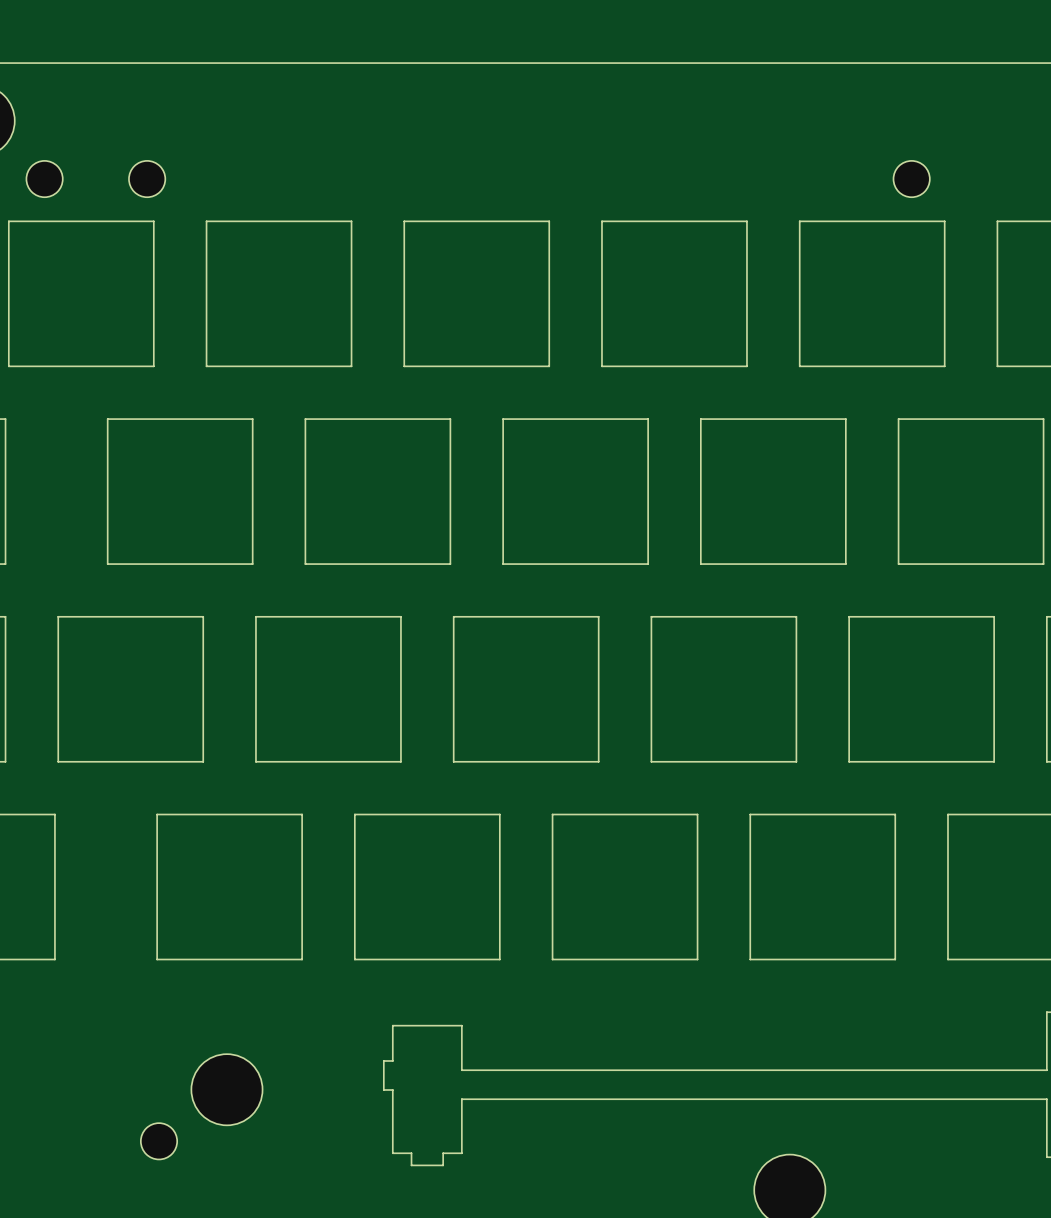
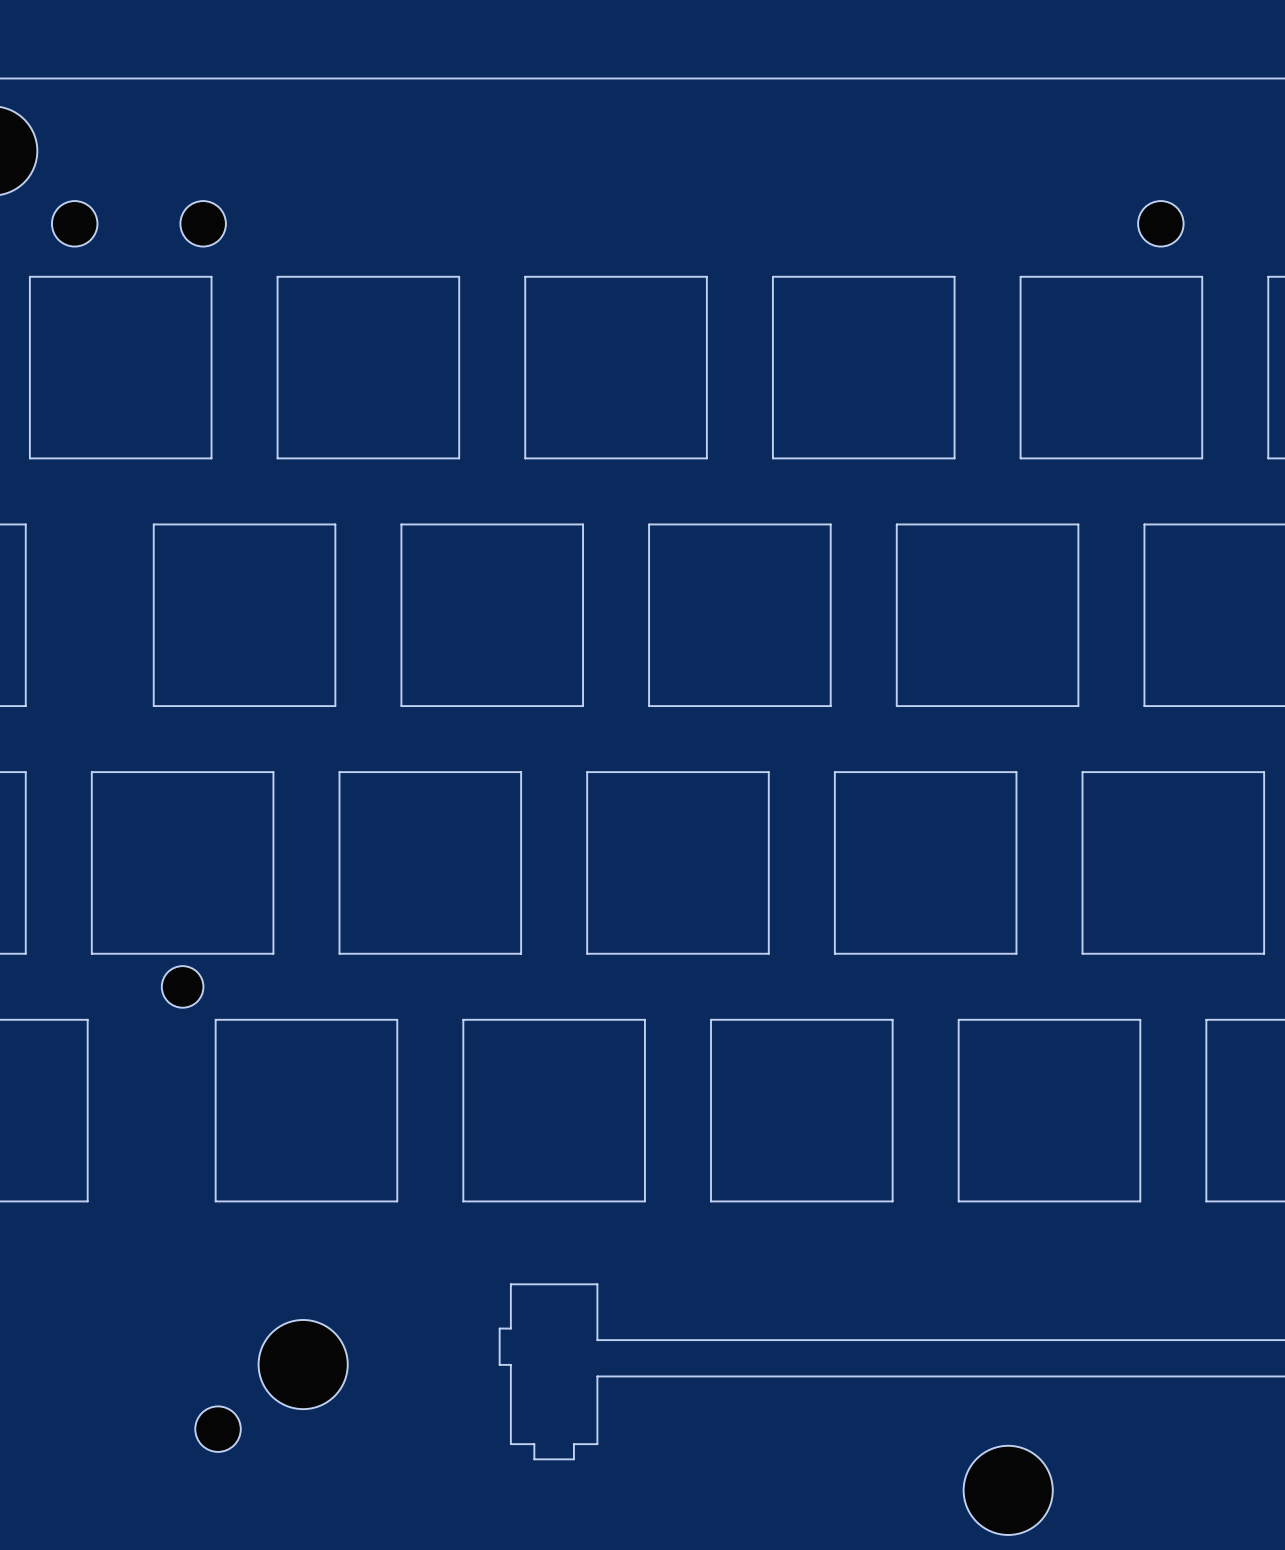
part: none -> (182, 986)

